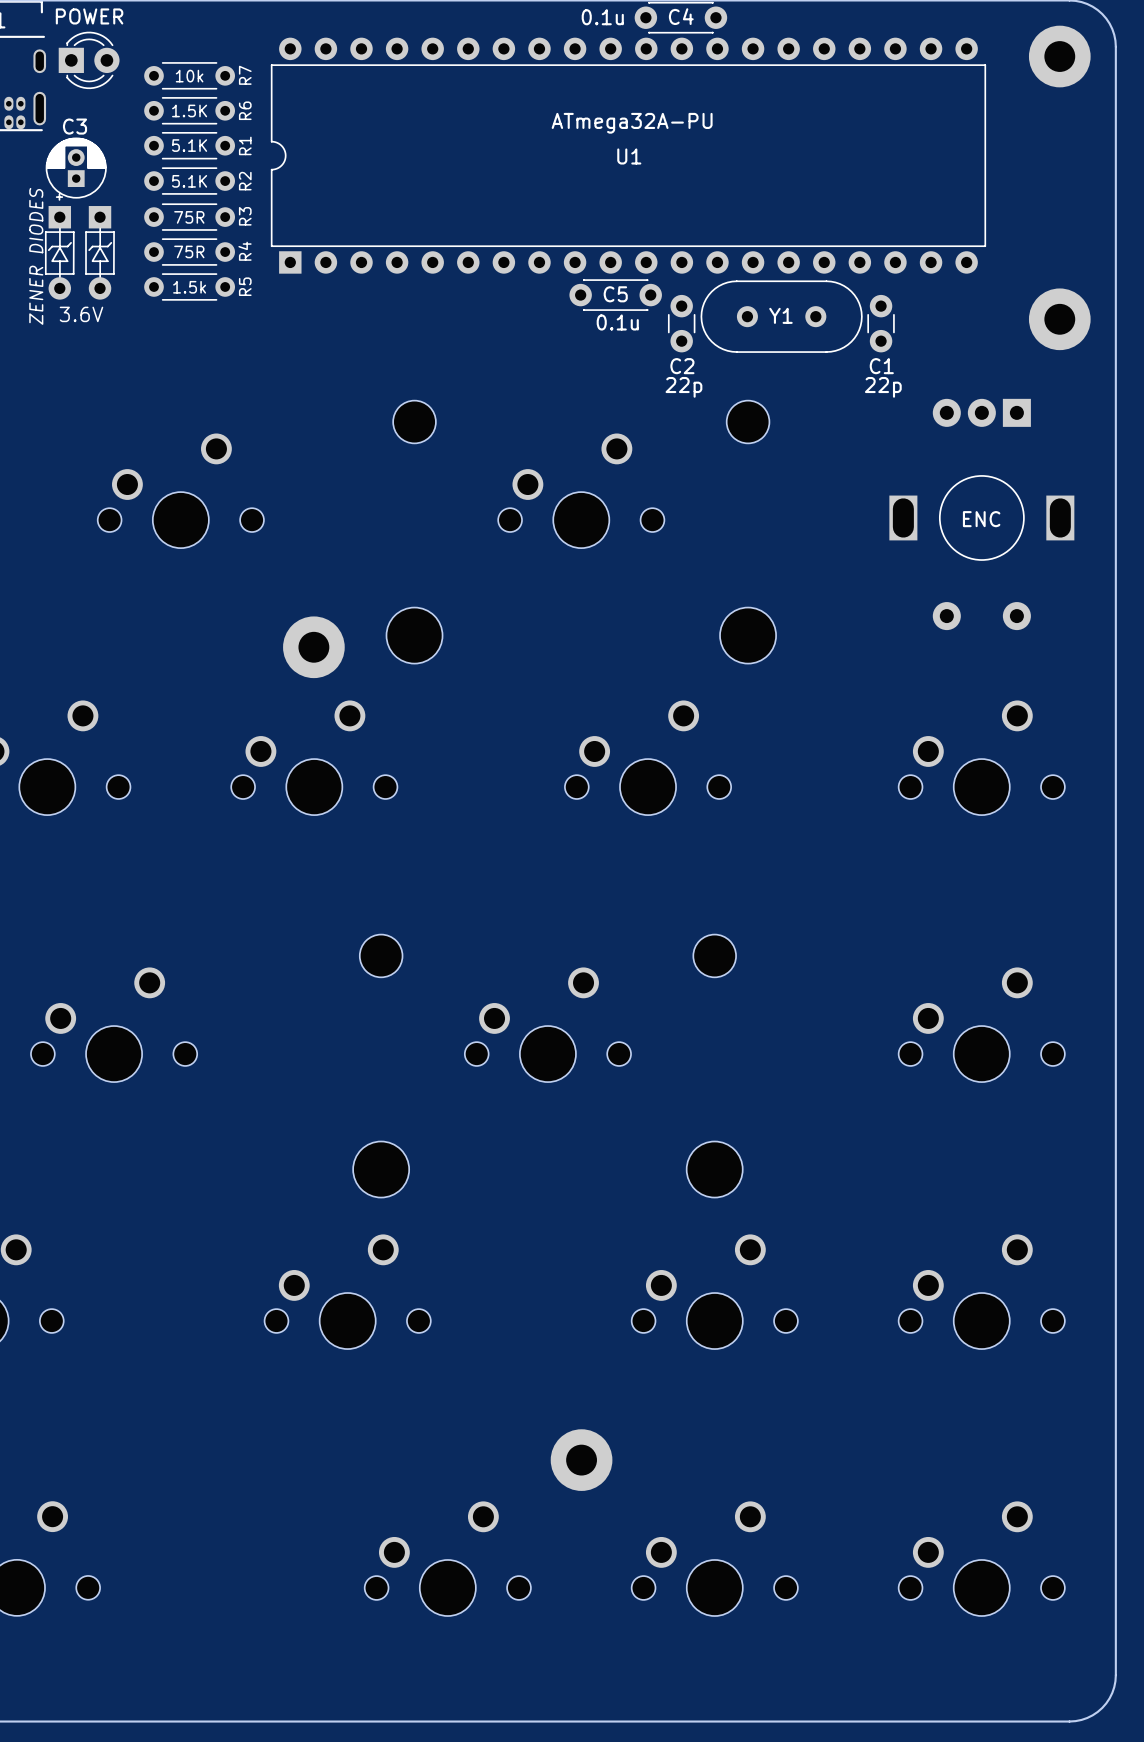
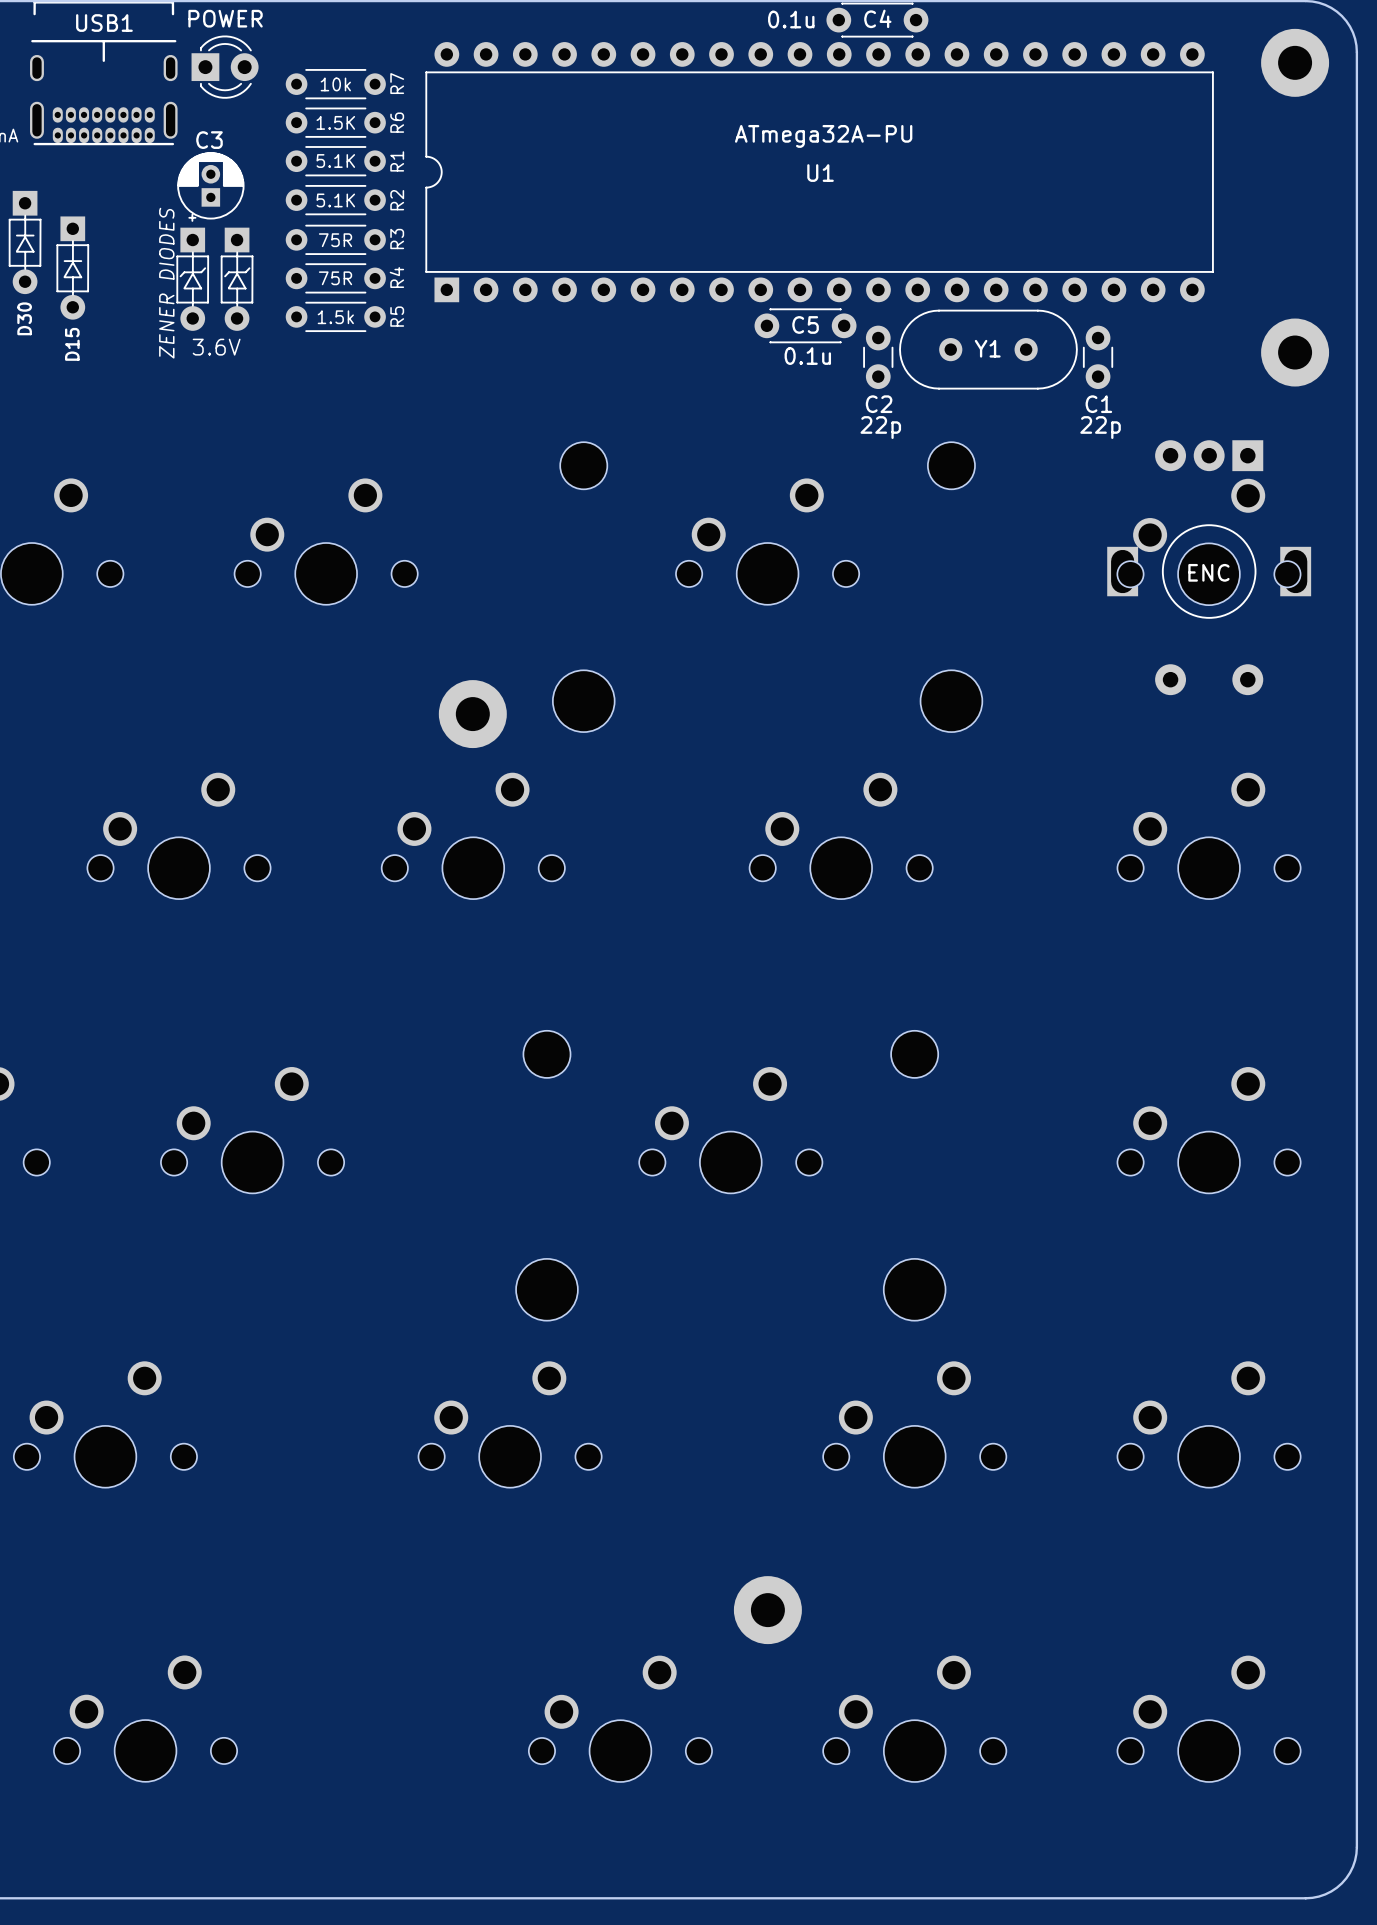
part: none -> (1208, 541)

